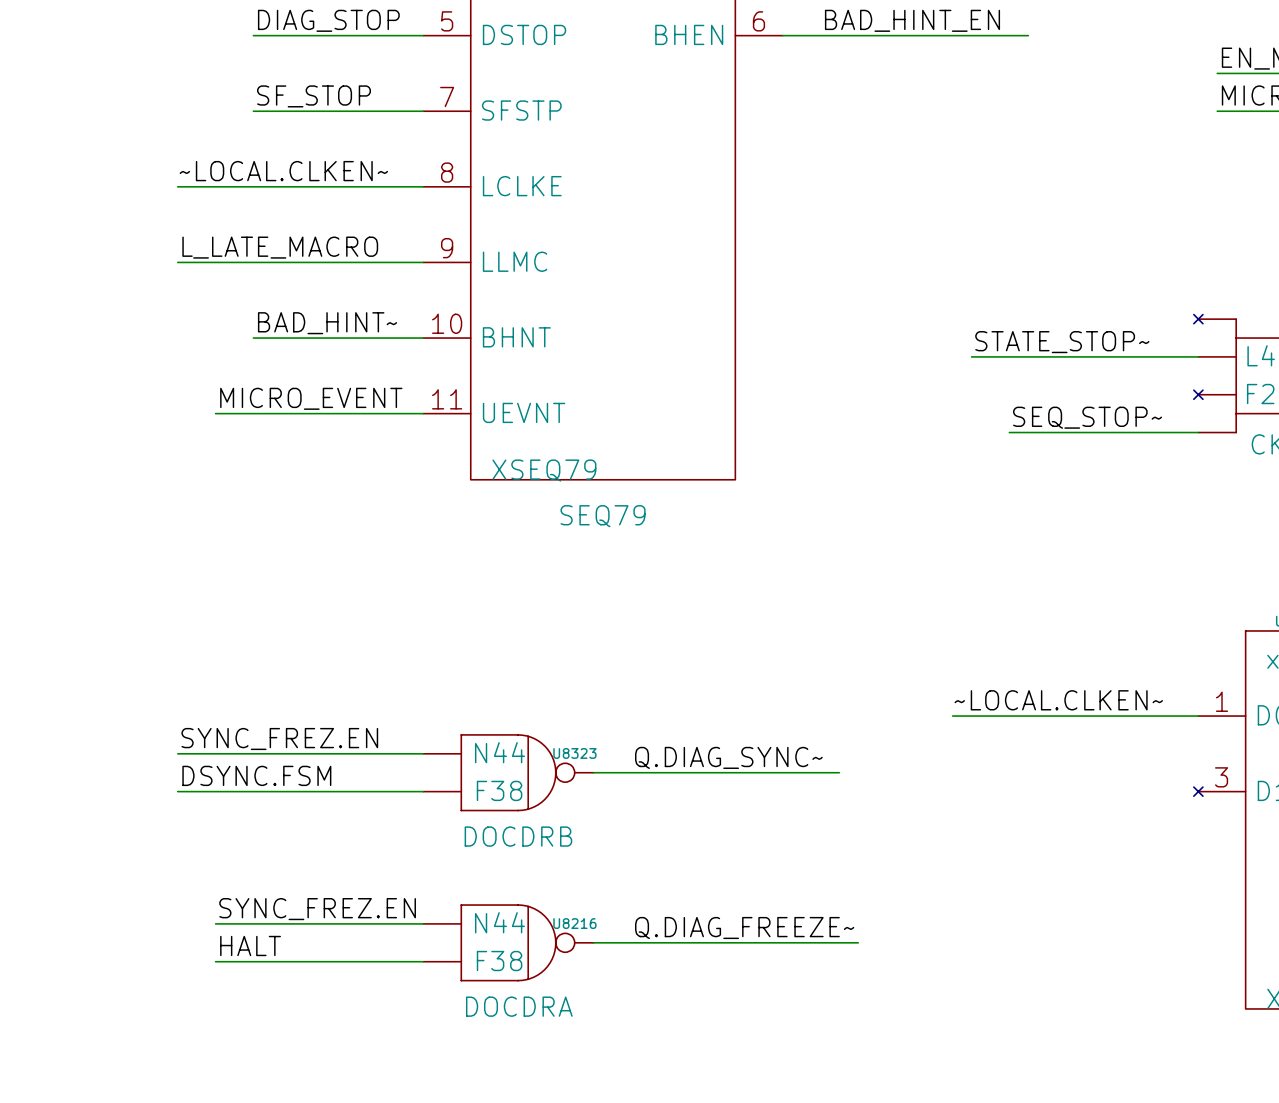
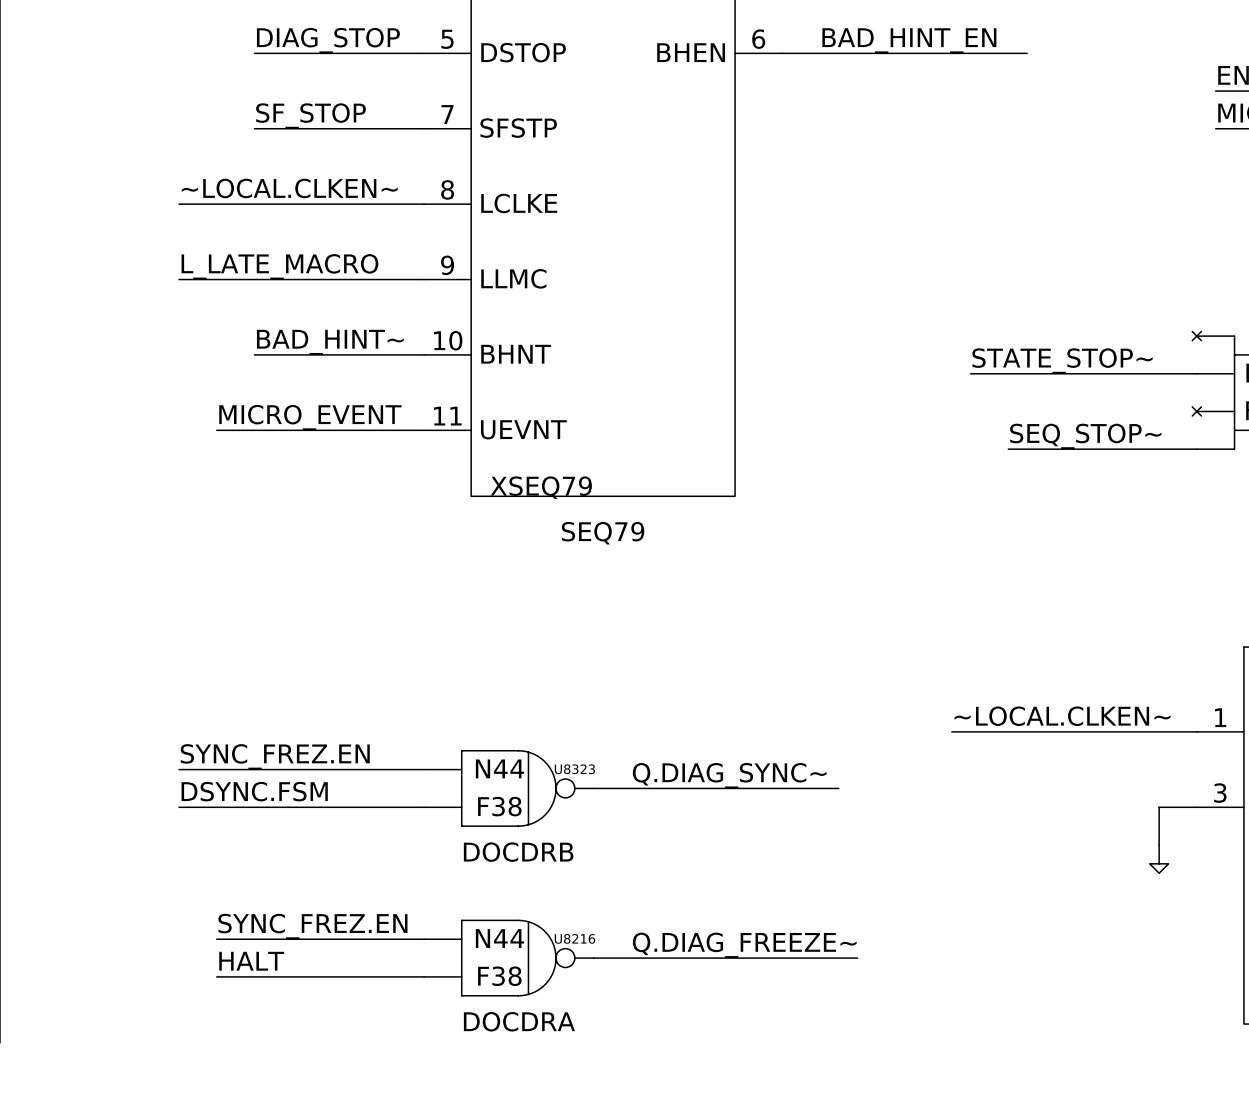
wire: none -> (1196, 807) (1159, 807) (1159, 844)
no-connect mark: (1198, 791) -> none
power symbol: none -> (1159, 859)

